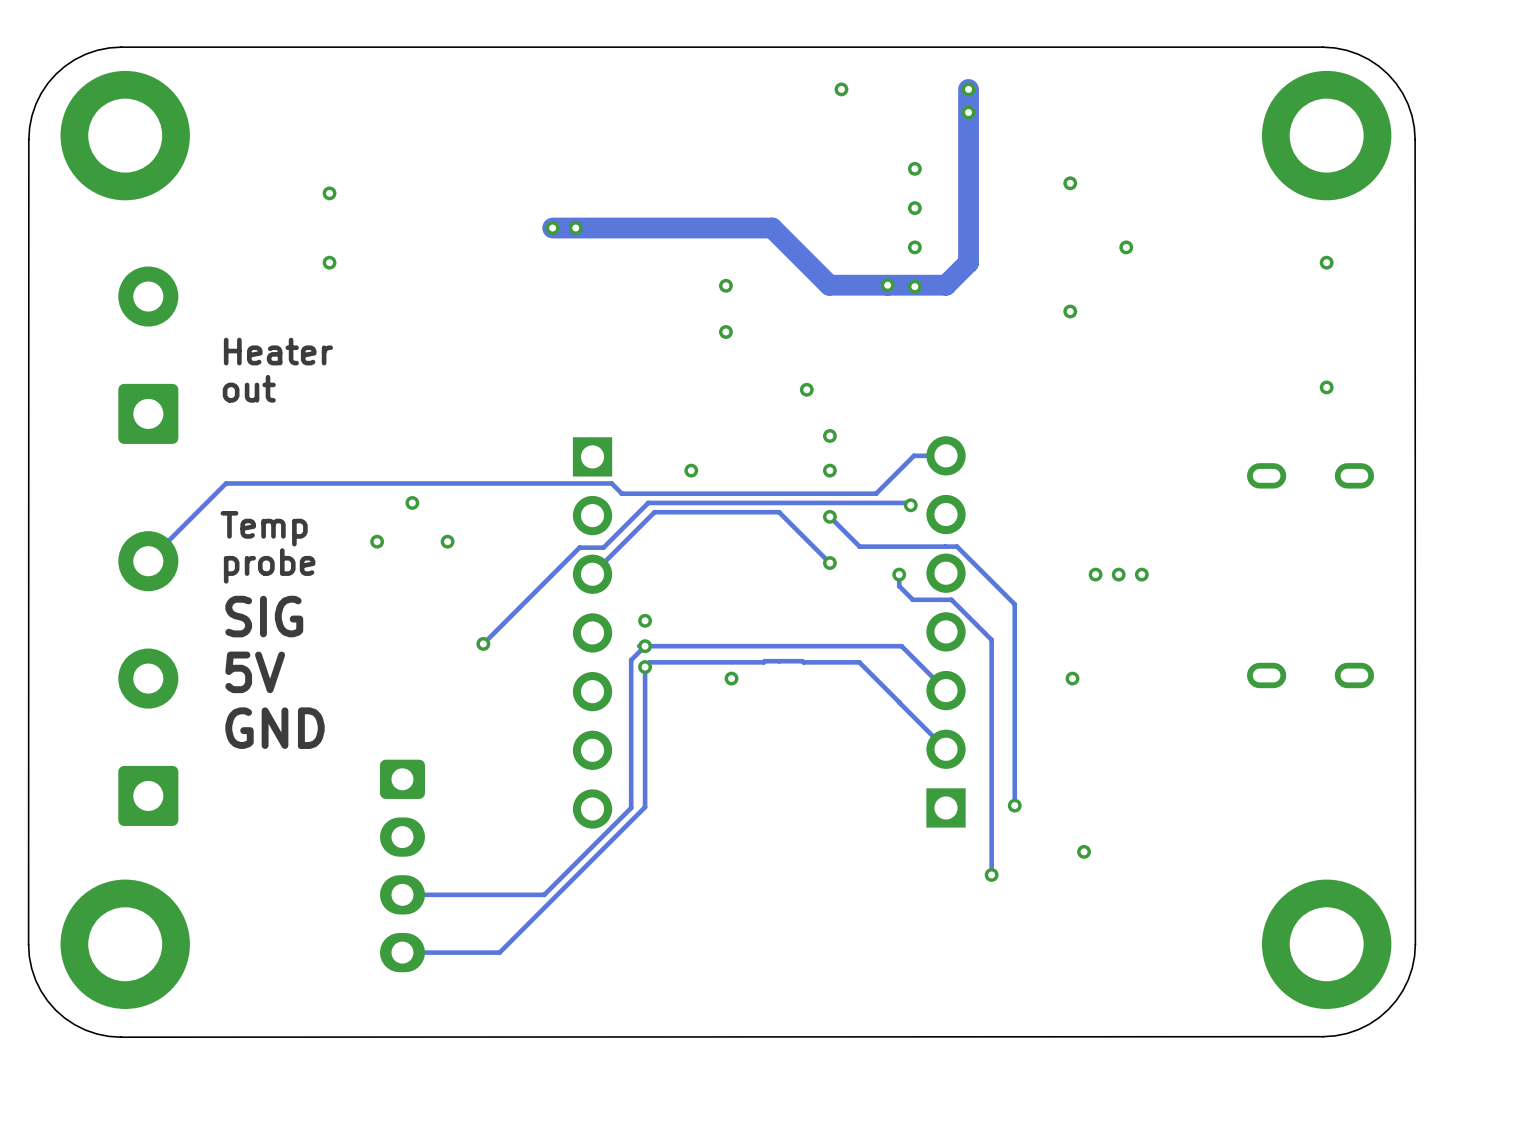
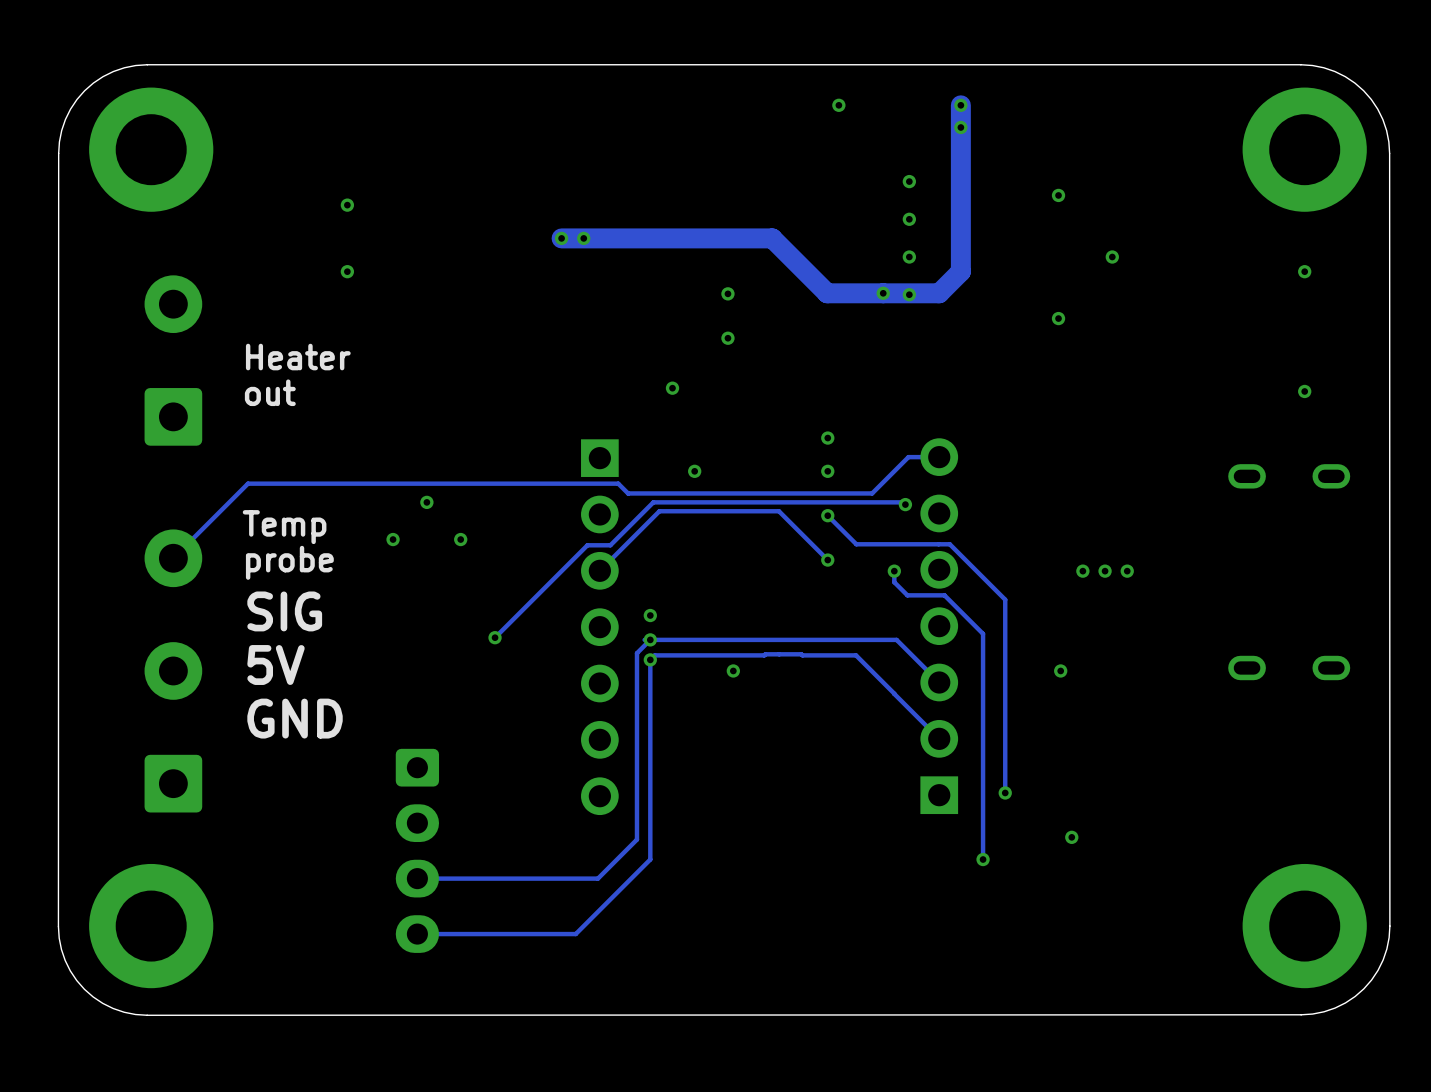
via: none -> (672, 388)
via: (806, 389) -> none
track: (631, 807) (544, 894) -> (636, 795) (636, 839) (597, 878) (553, 878)
track: (645, 807) (499, 952) -> (650, 794) (650, 859) (575, 934) (510, 934)

